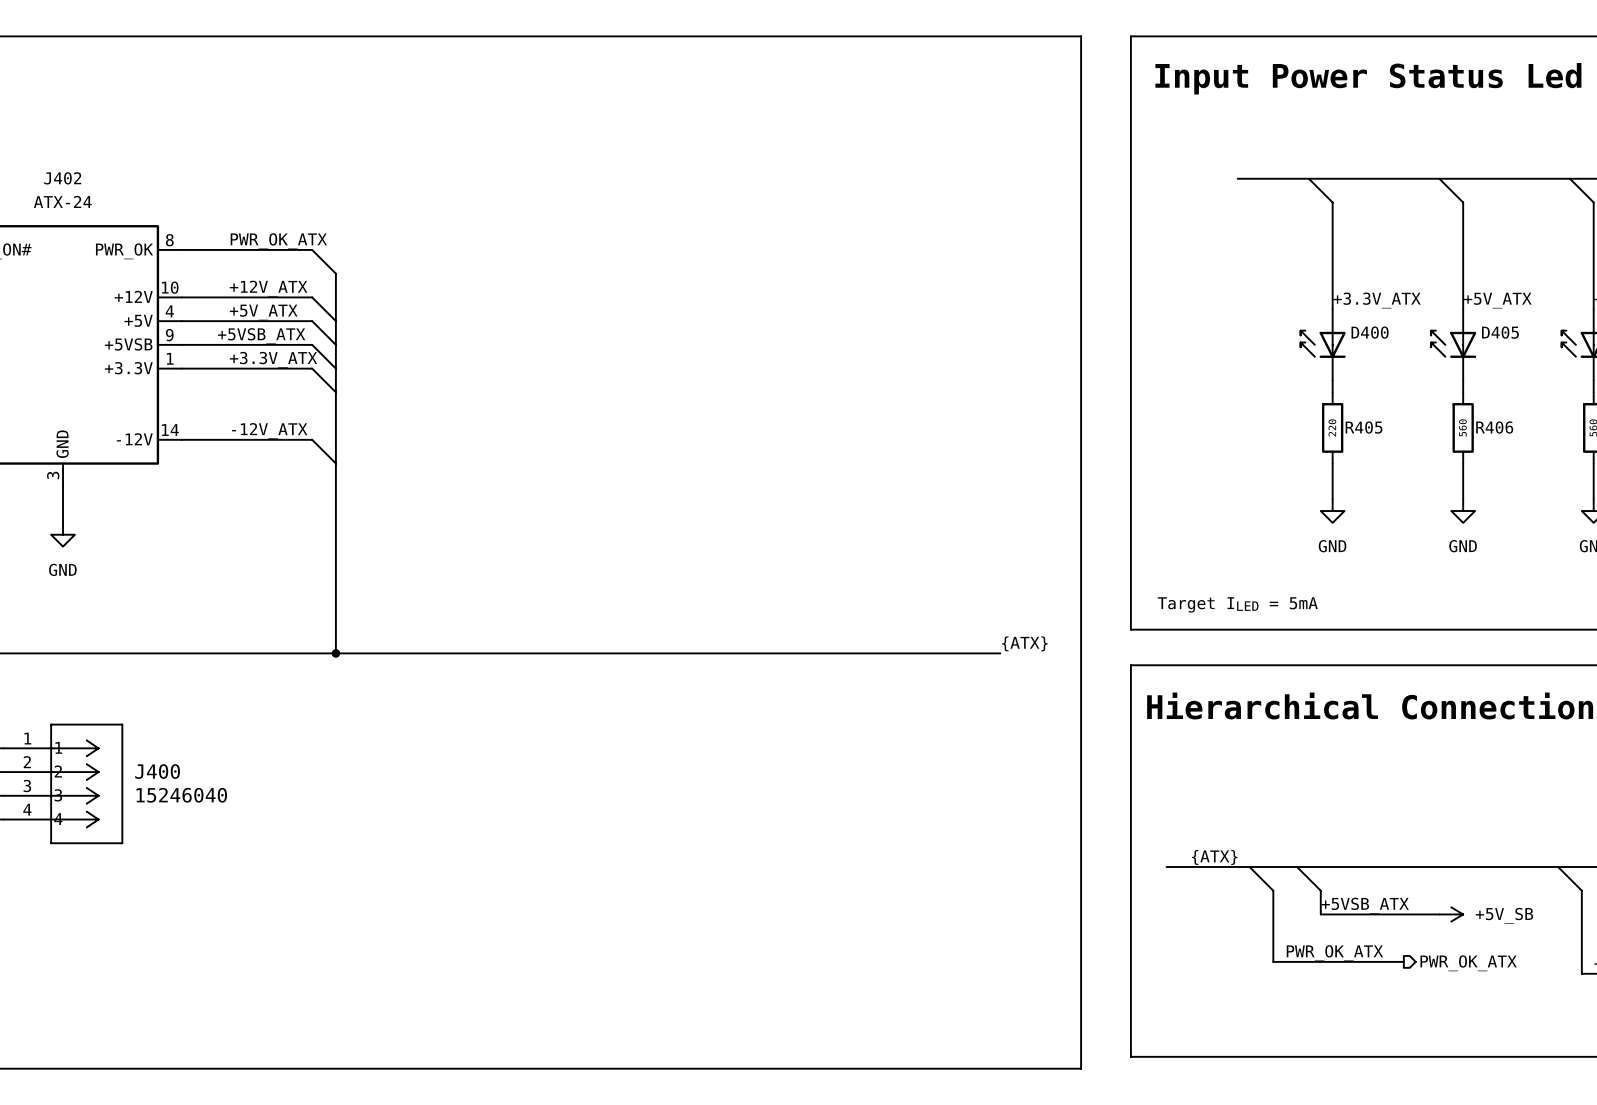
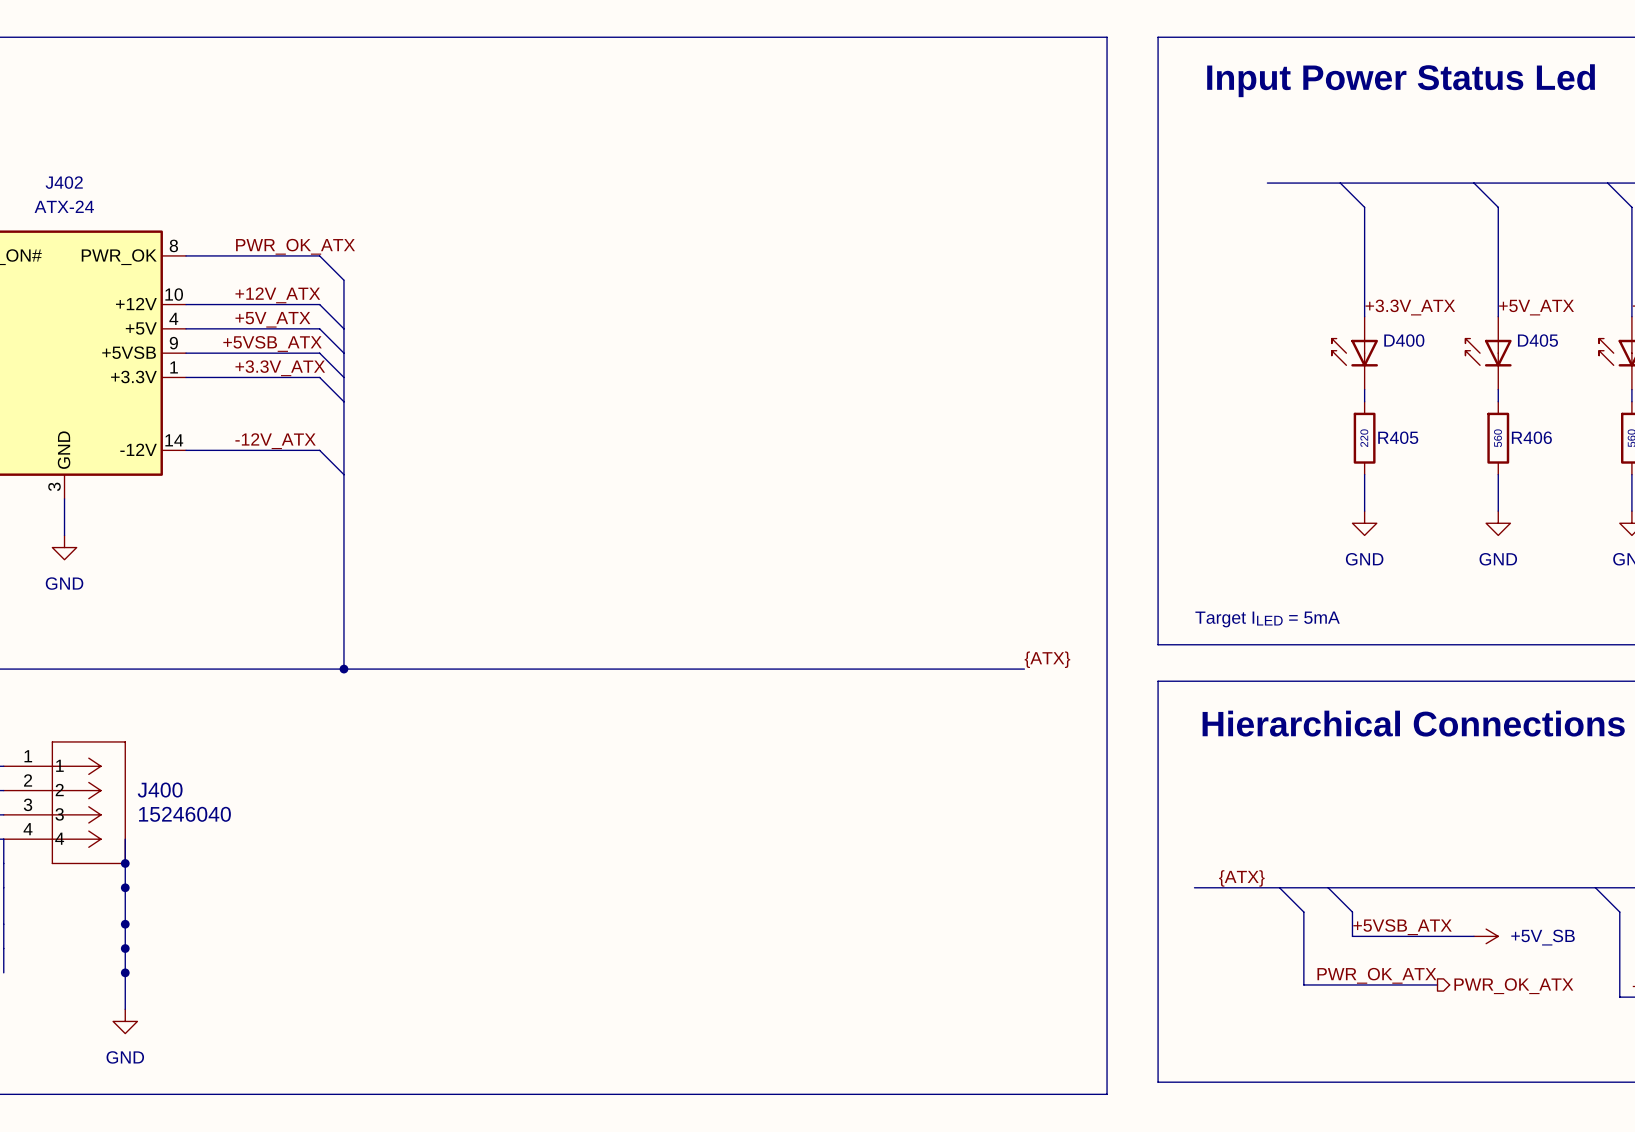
wire: none -> (3, 839) (3, 972)
wire: none -> (125, 839) (125, 1009)
junction: none -> (125, 863)
junction: none -> (125, 887)
junction: none -> (125, 924)
junction: none -> (125, 948)
junction: none -> (125, 972)
power symbol: none -> GND (125, 1021)

